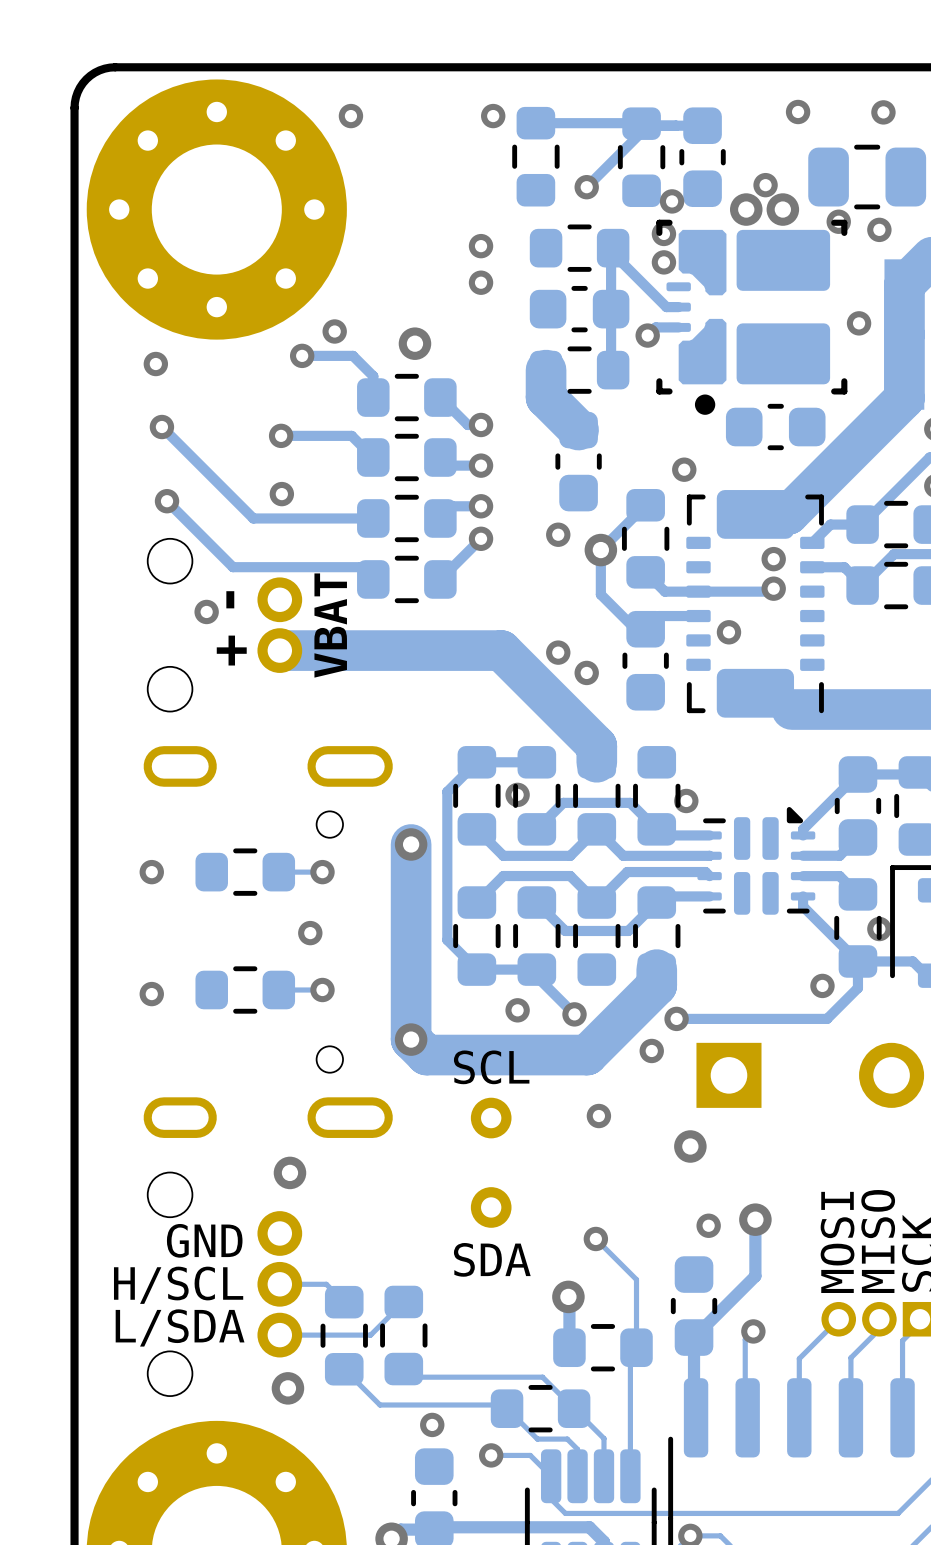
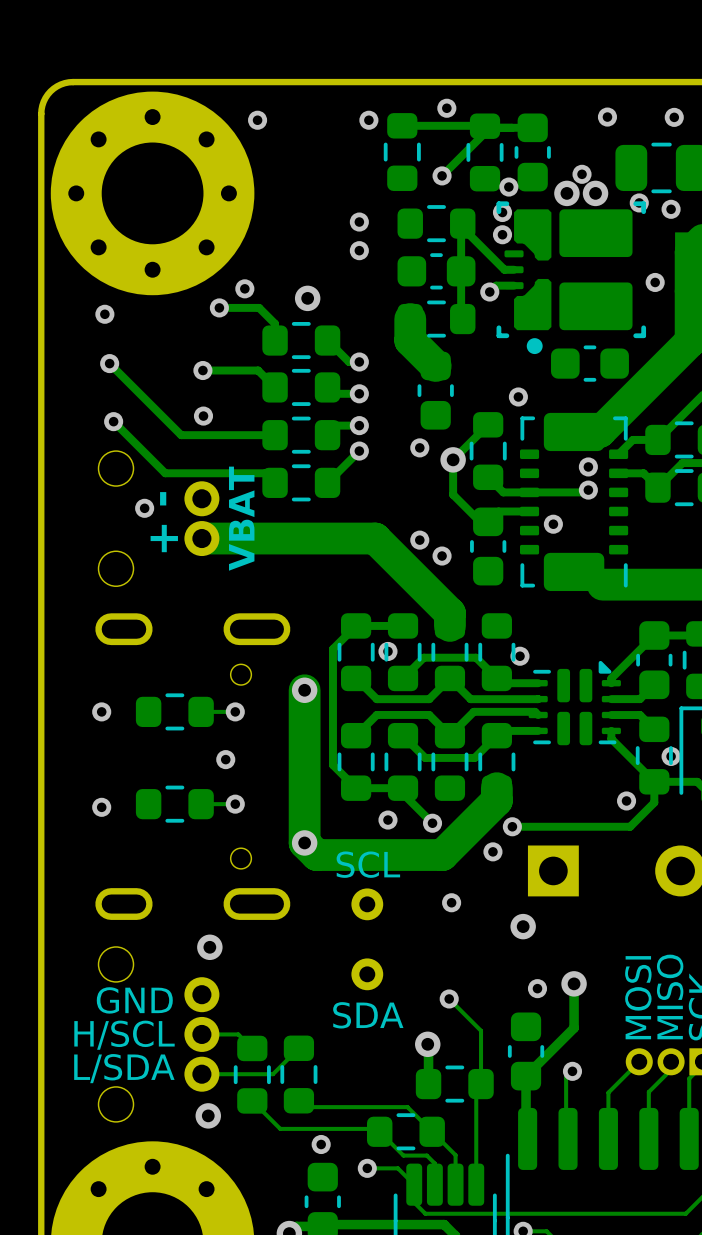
via: none -> (446, 108)

